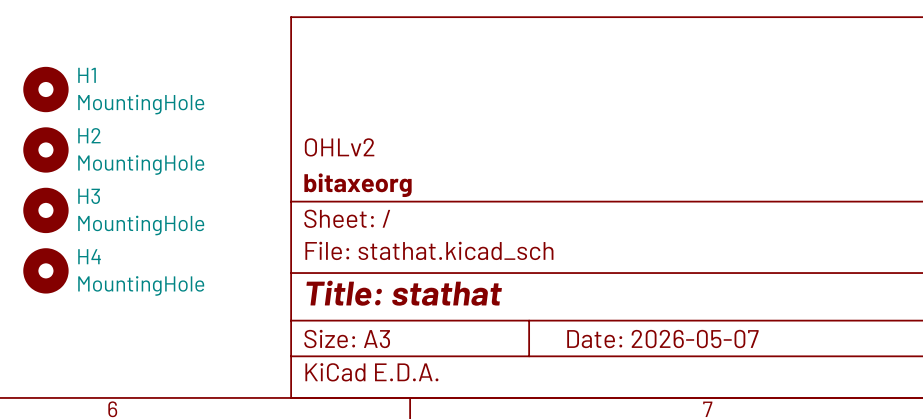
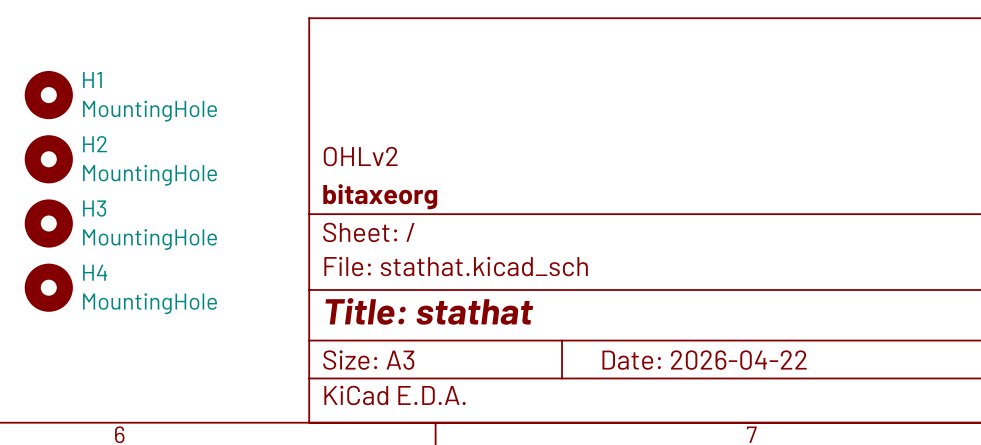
title block: Date: 2026-05-07 (662, 339) -> Date: 2026-04-22 (704, 360)

